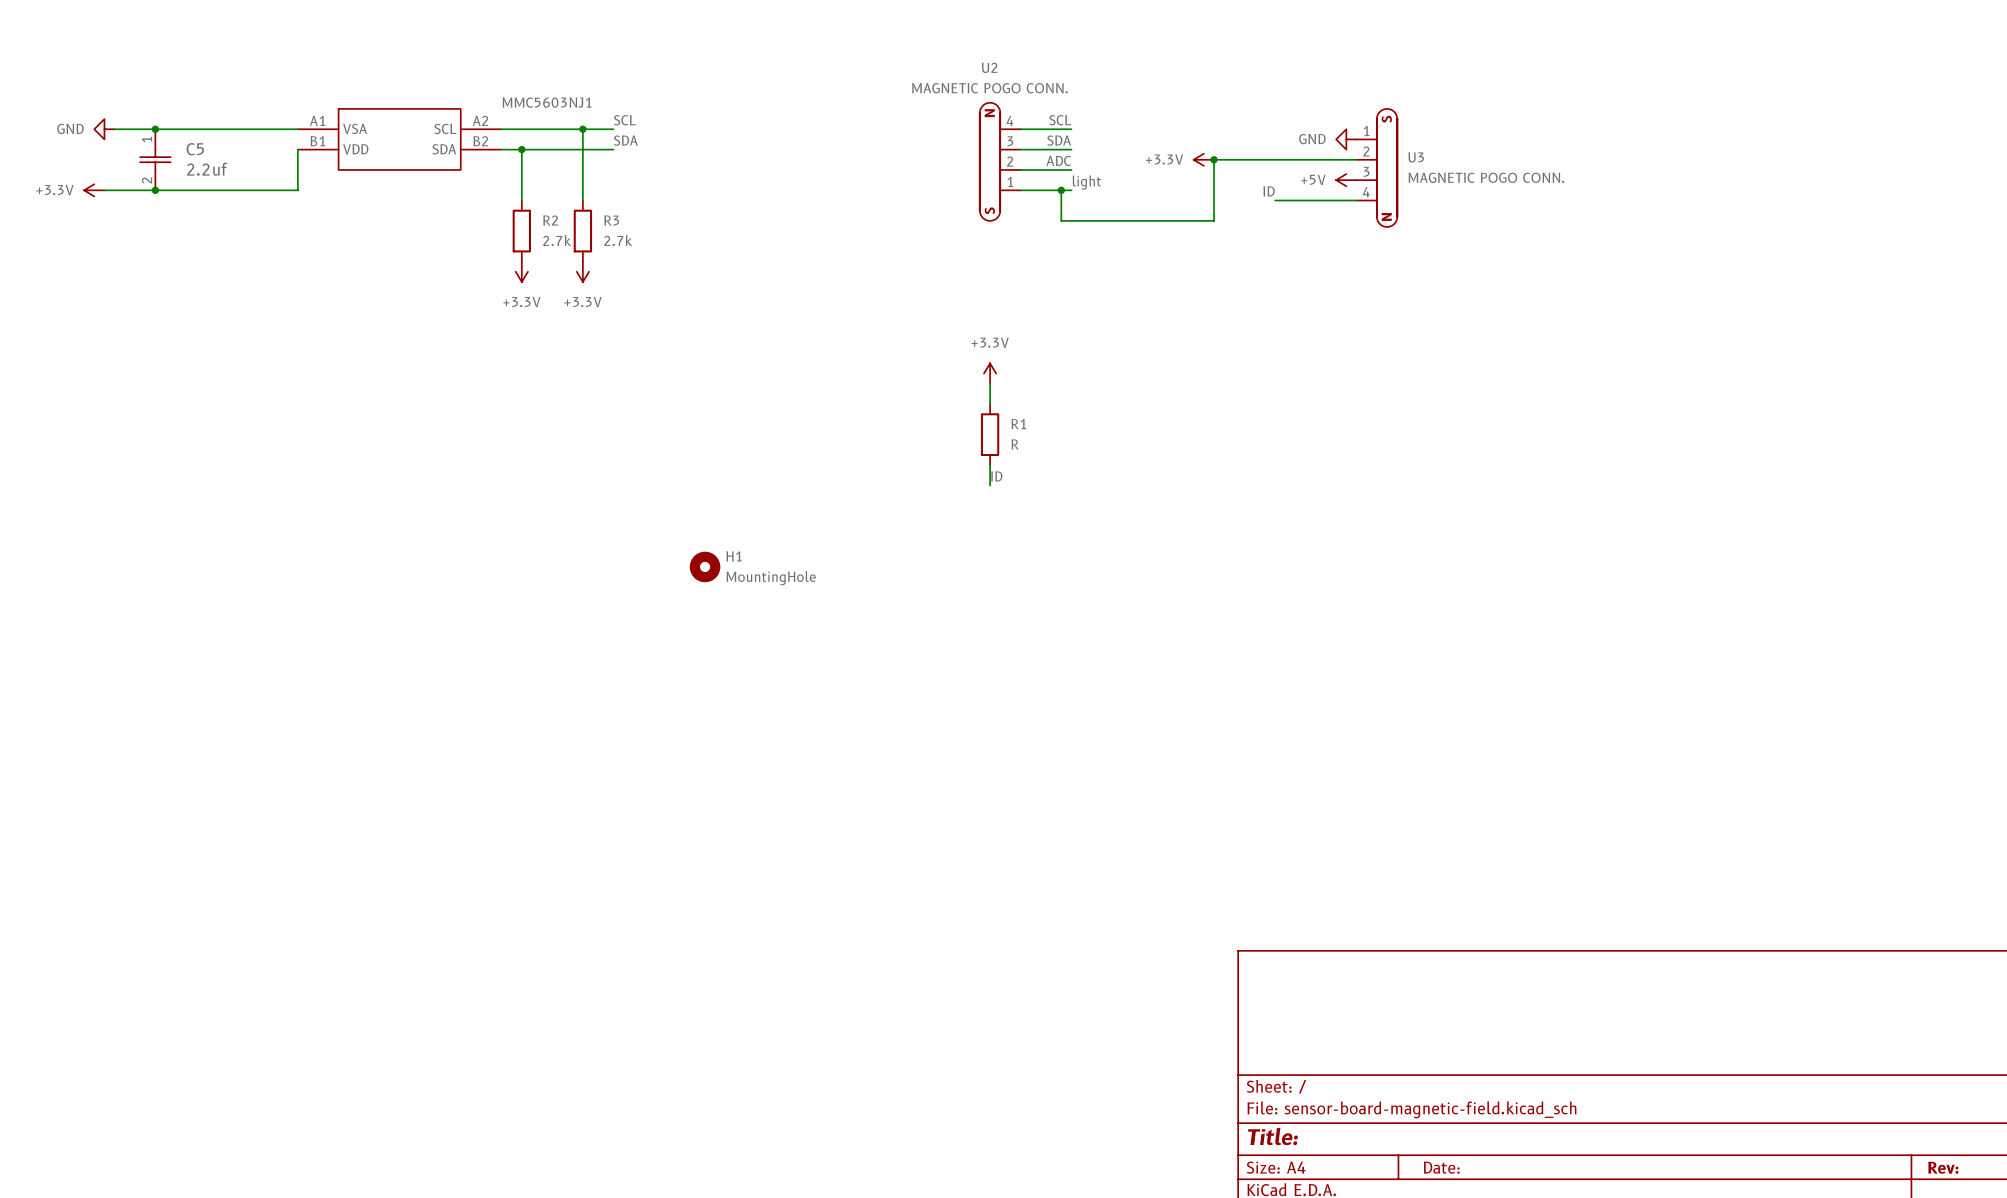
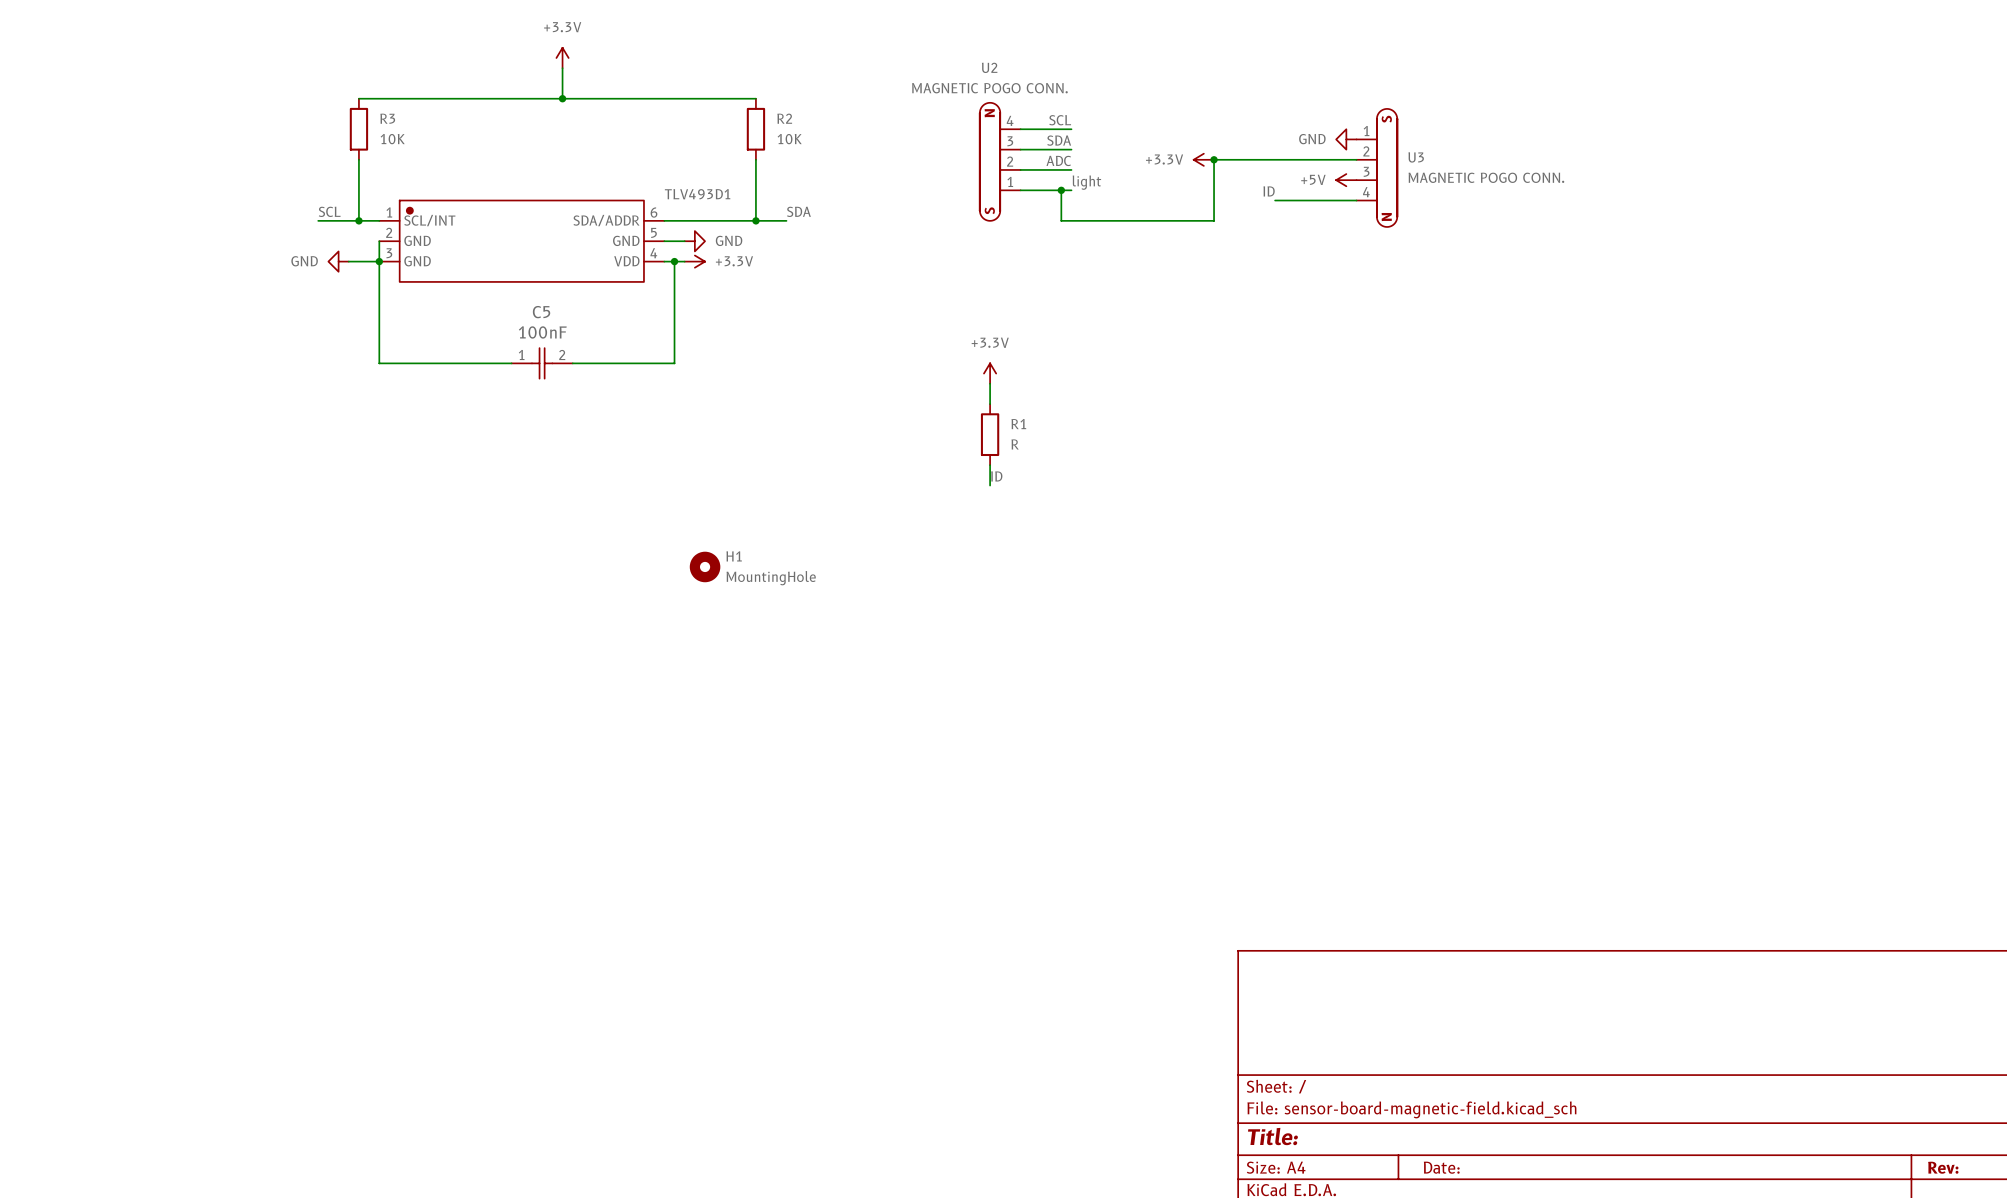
power symbol: none -> +3.3V (562, 58)
wire: none -> (562, 68) (562, 98)
wire: none -> (358, 98) (755, 98)
junction: none -> (562, 98)
label: SCL (624, 120) -> none
power symbol: GND (104, 129) -> none
wire: (114, 129) (297, 129) -> none
junction: (155, 129) -> none
wire: (501, 129) (613, 129) -> none
wire: (582, 129) (582, 200) -> none
junction: (582, 129) -> none
MMC5603NJ1: (399, 139) -> none
label position: SDA (625, 140) -> SDA (798, 211)
wire: (297, 149) (297, 190) (104, 190) -> none
wire: (501, 149) (613, 149) -> none
wire: (521, 149) (521, 200) -> none
junction: (521, 149) -> none
C5 rotation: 0° (155, 159) -> 90° counterclockwise (542, 363)
C5 position: (155, 159) -> (542, 363)
wire: none -> (358, 159) (358, 220)
wire: none -> (755, 159) (755, 220)
C5 value: 2.2uf (207, 169) -> 100nF (542, 332)
power symbol: +3.3V (94, 190) -> none
junction: (155, 190) -> none
label: none -> SCL (329, 211)
wire: none -> (318, 220) (379, 220)
junction: none -> (358, 220)
wire: none -> (664, 220) (786, 220)
junction: none -> (755, 220)
R2 position: (521, 231) -> (755, 129)
R3 position: (582, 231) -> (358, 129)
R2 value: 2.7k (557, 240) -> 10K (789, 139)
R3 value: 2.7k (618, 240) -> 10K (392, 139)
wire: none -> (379, 241) (379, 363) (511, 363)
TLV493D1: none -> (521, 241)
wire: none -> (664, 241) (684, 241)
power symbol: none -> GND (694, 241)
power symbol: none -> GND (338, 261)
wire: none -> (348, 261) (379, 261)
junction: none -> (379, 261)
wire: none -> (664, 261) (684, 261)
wire: none -> (674, 261) (674, 363) (572, 363)
junction: none -> (674, 261)
power symbol: none -> +3.3V (694, 261)
power symbol: +3.3V (521, 271) -> none
power symbol: +3.3V (582, 271) -> none

